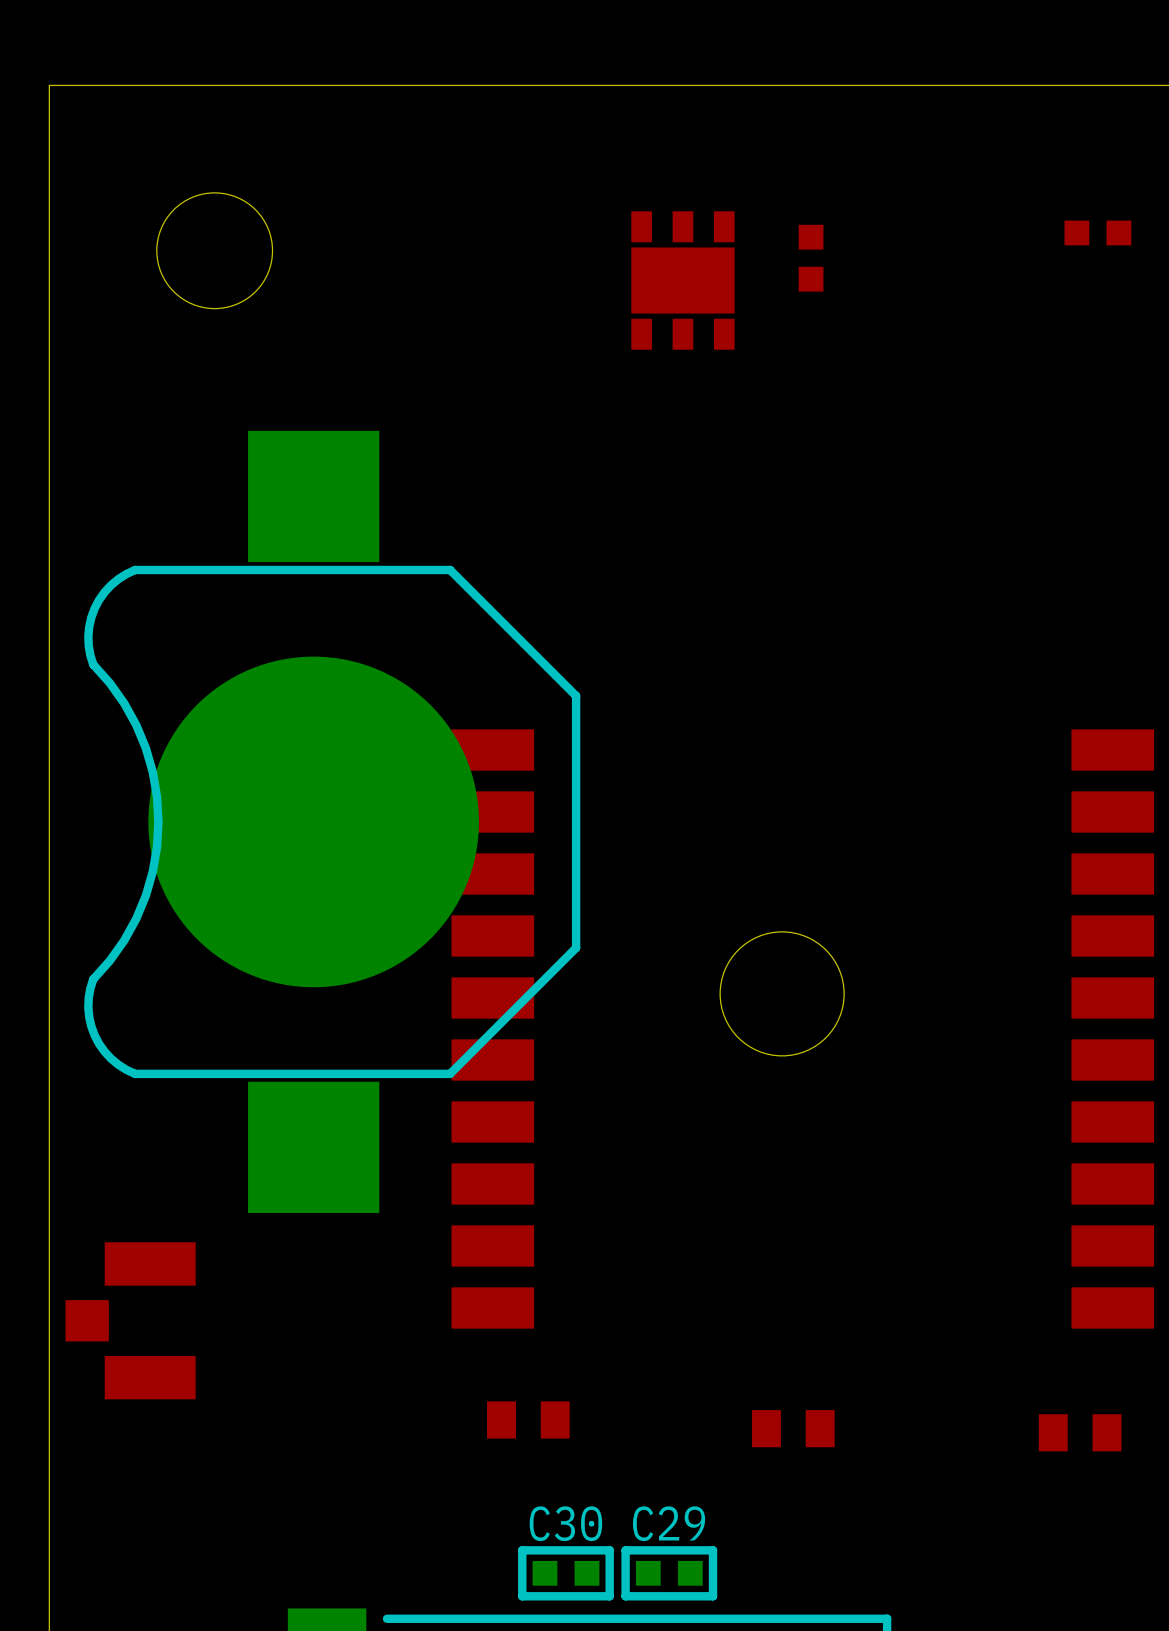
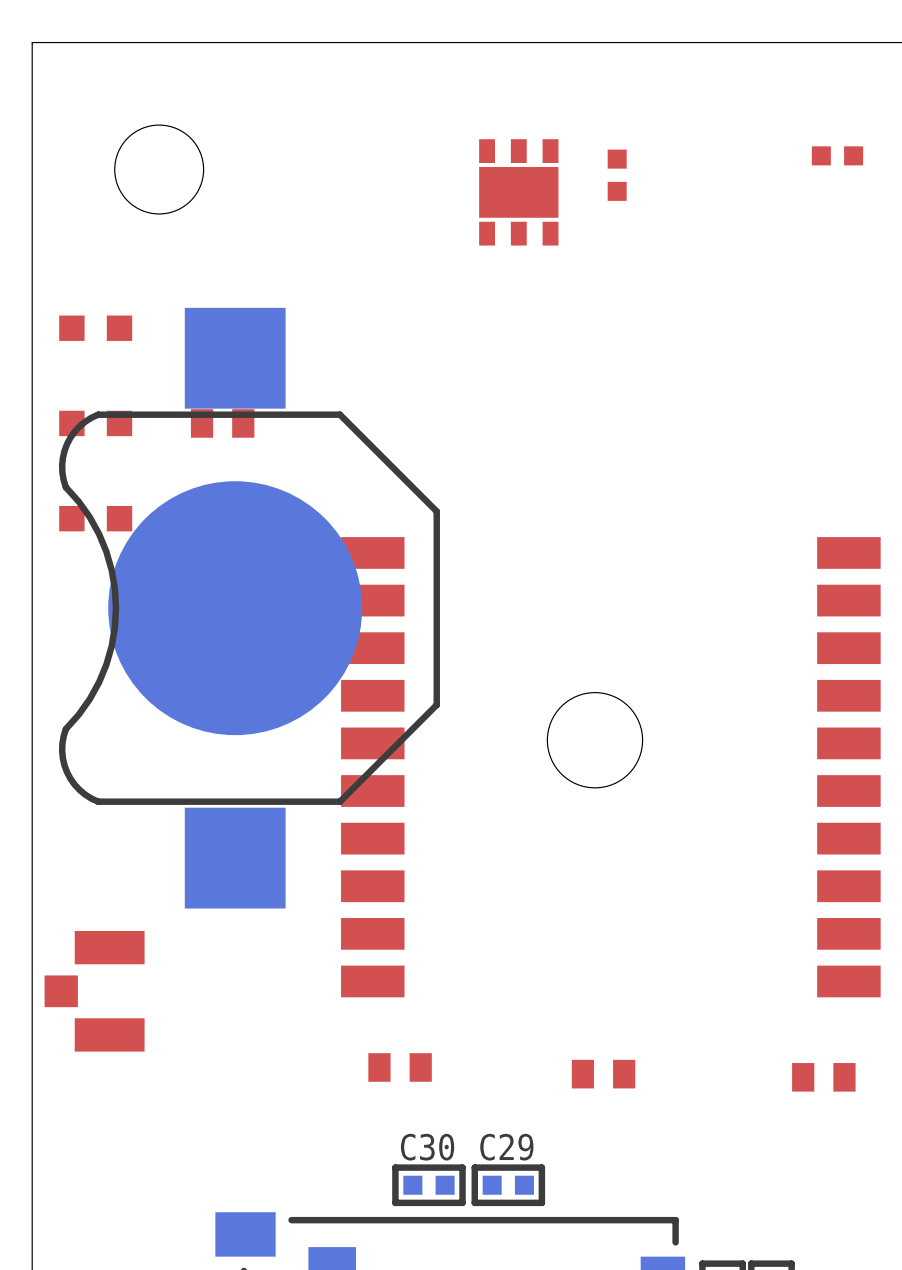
part: none -> (95, 328)
part: none -> (95, 423)
part: none -> (222, 423)
part: none -> (95, 518)

